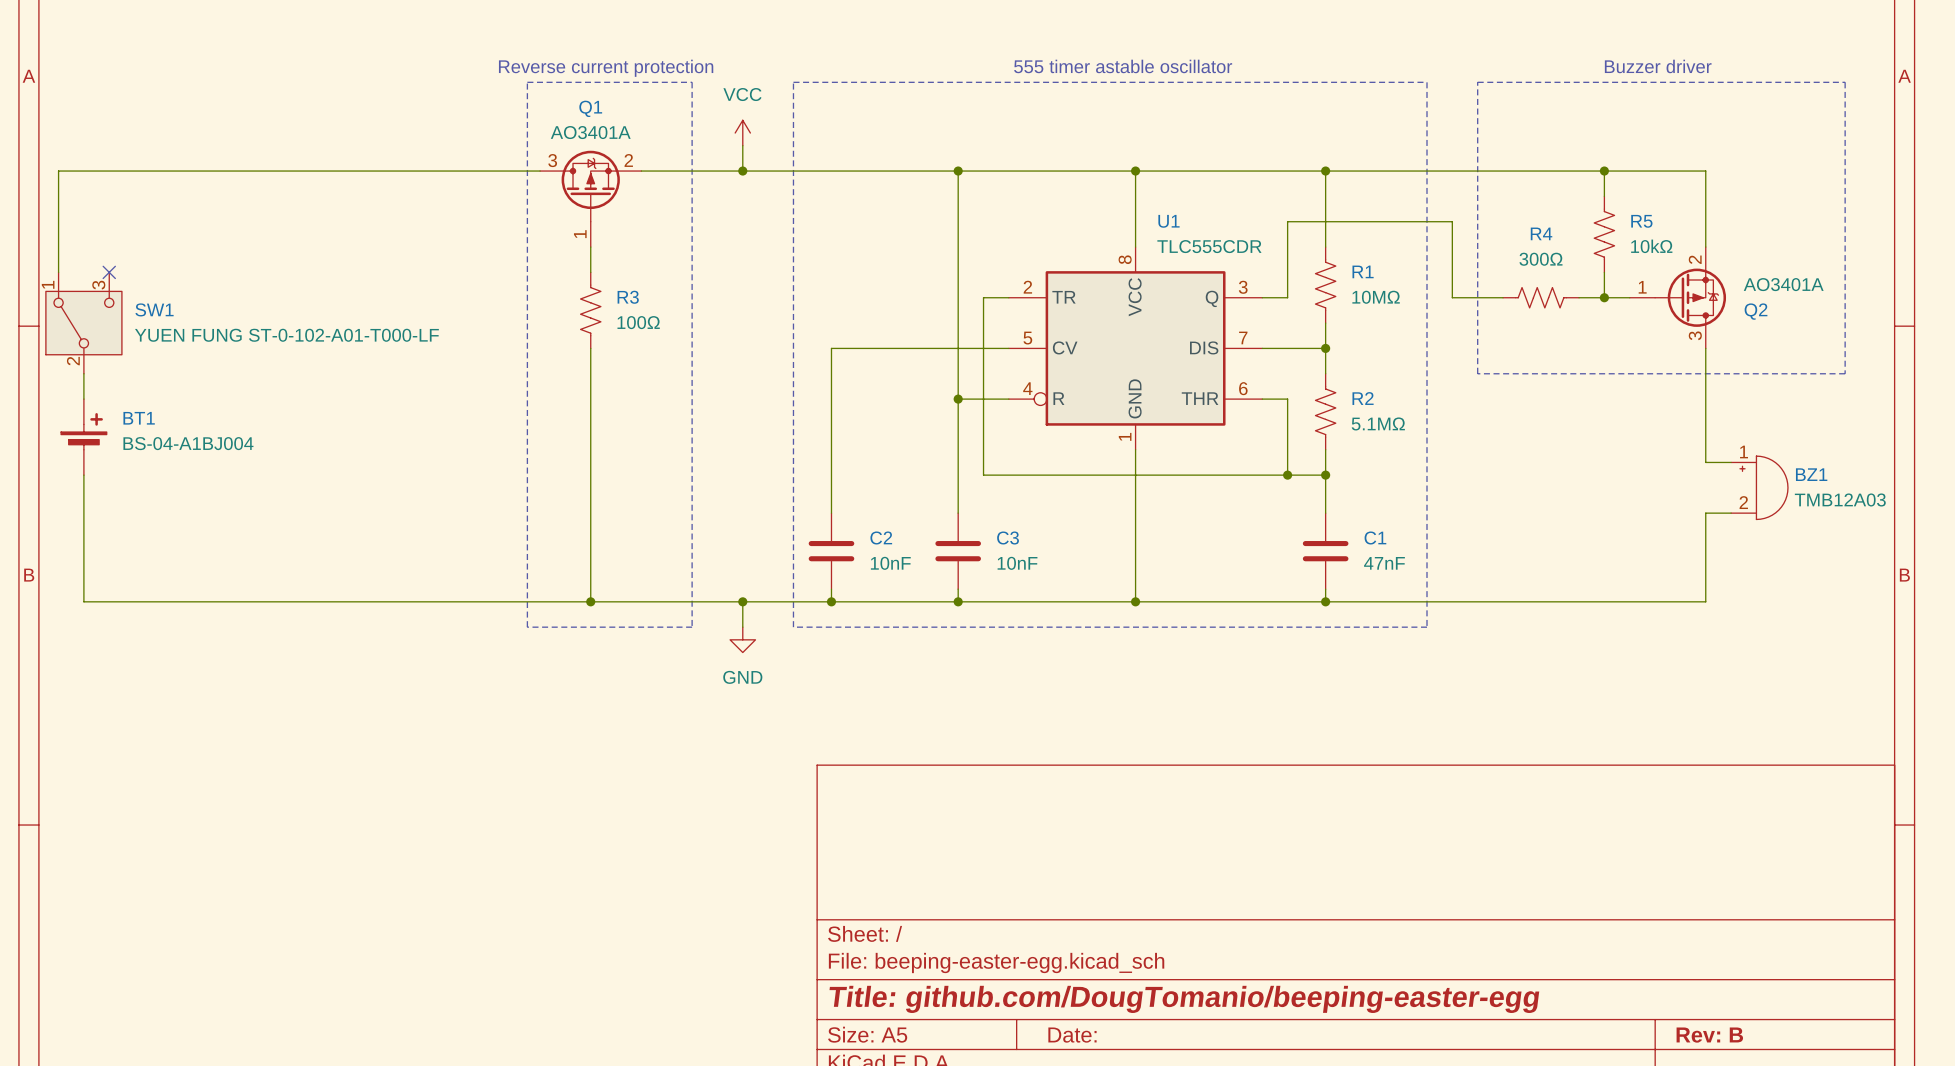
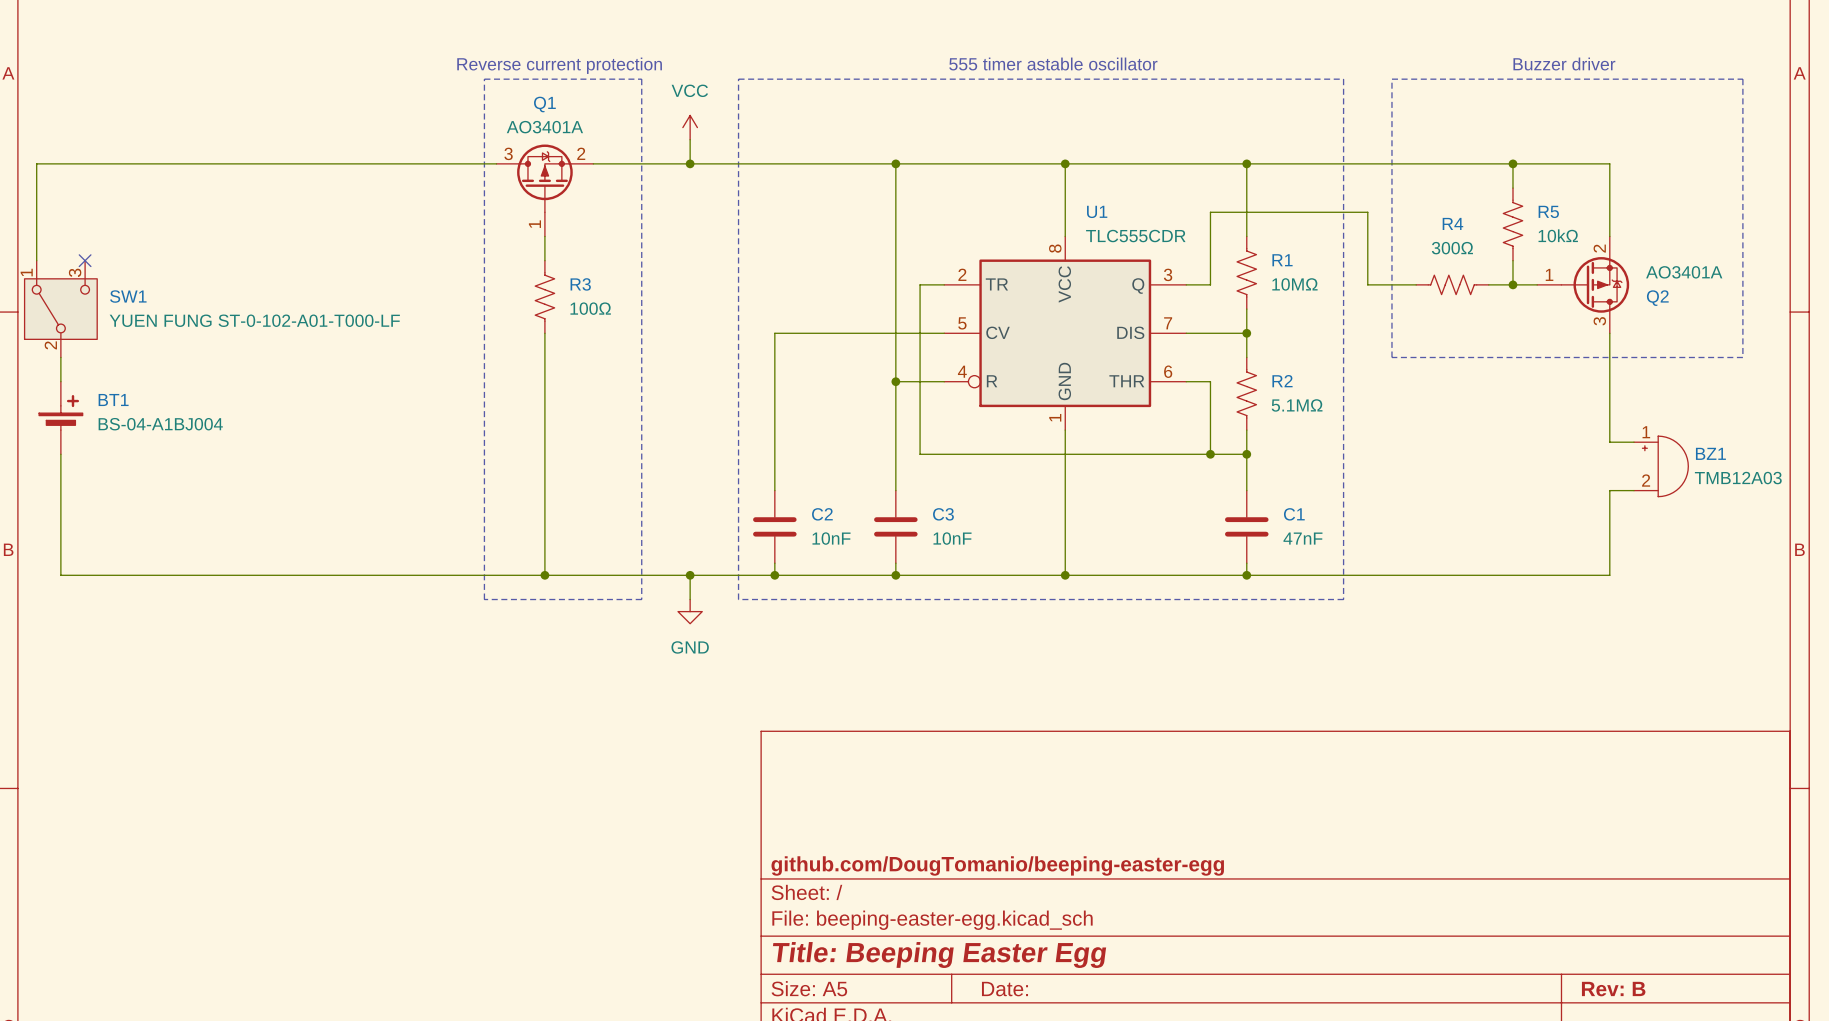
title block: none -> github.com/DougTomanio/beeping-easter-egg (997, 865)
title block: Title: github.com/DougTomanio/beeping-easter-egg (1184, 999) -> Title: Beeping Easter Egg (939, 955)

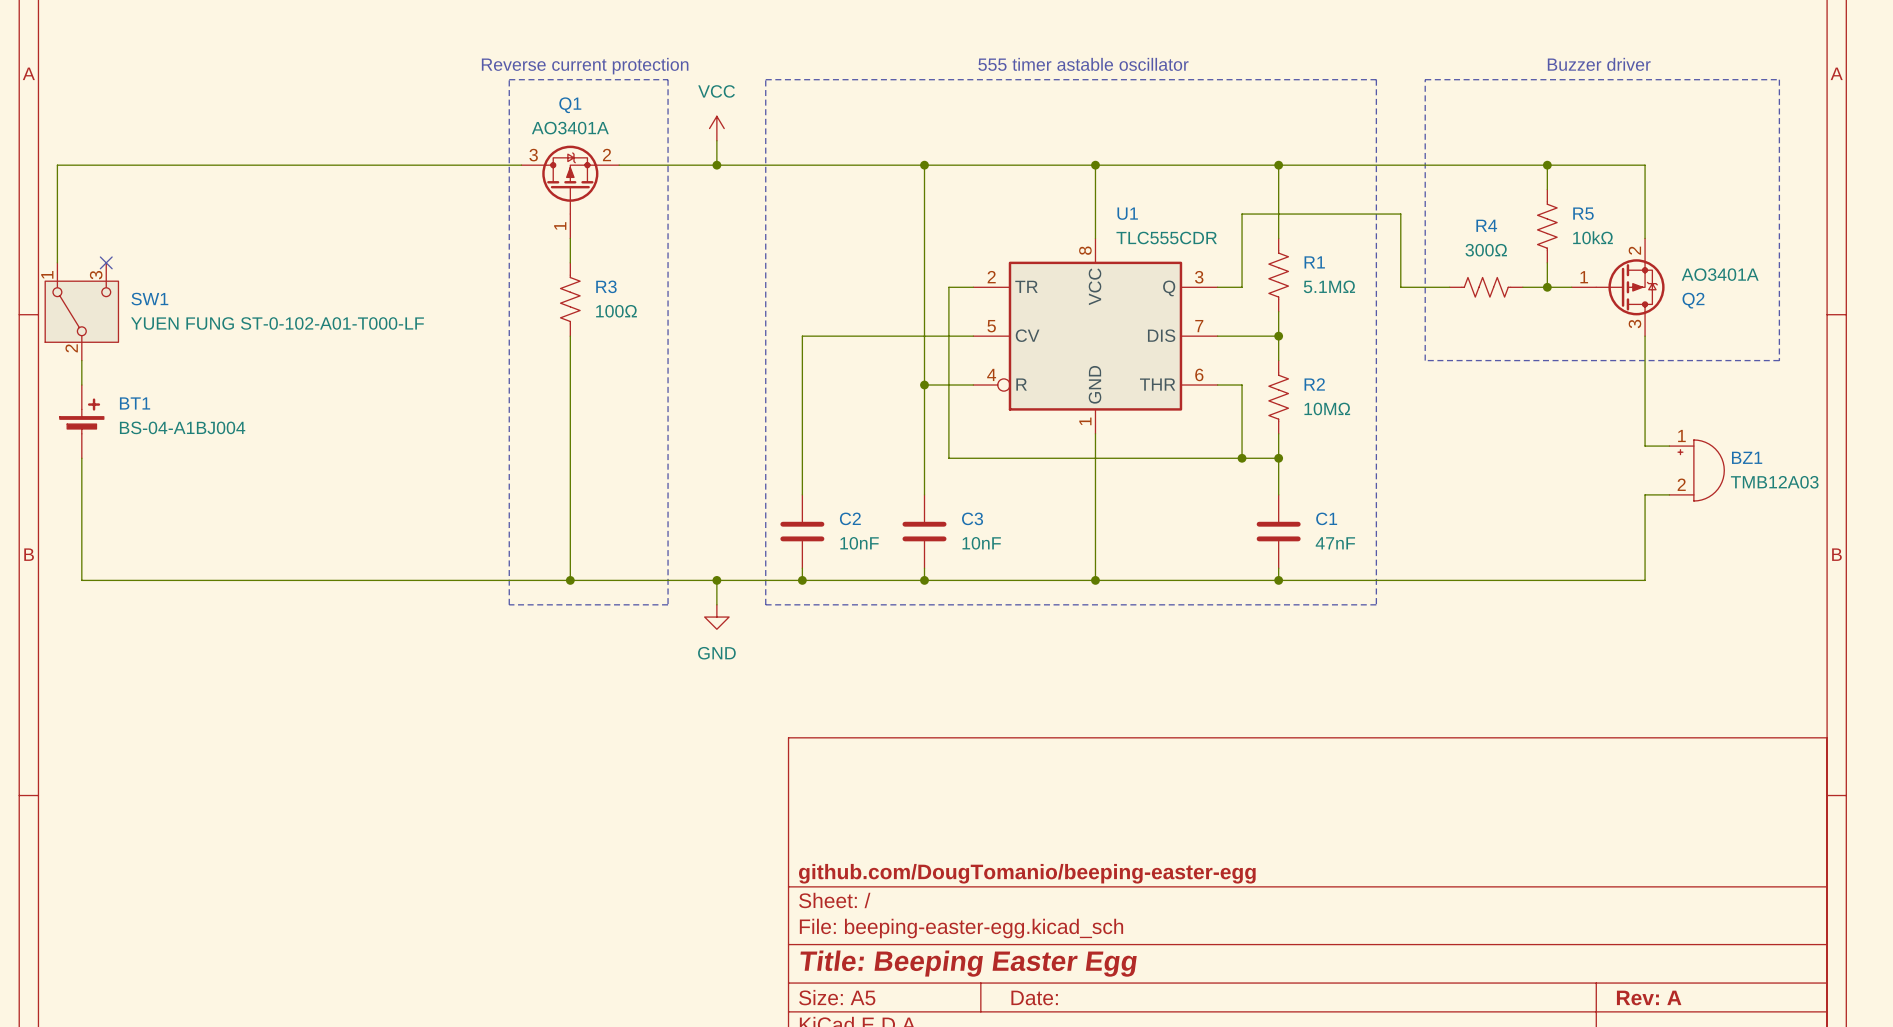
R1 value: 10MΩ (1294, 284) -> 5.1MΩ (1329, 286)
R2 value: 5.1MΩ (1297, 405) -> 10MΩ (1327, 408)
title block: Rev: B (1613, 989) -> Rev: A (1649, 997)

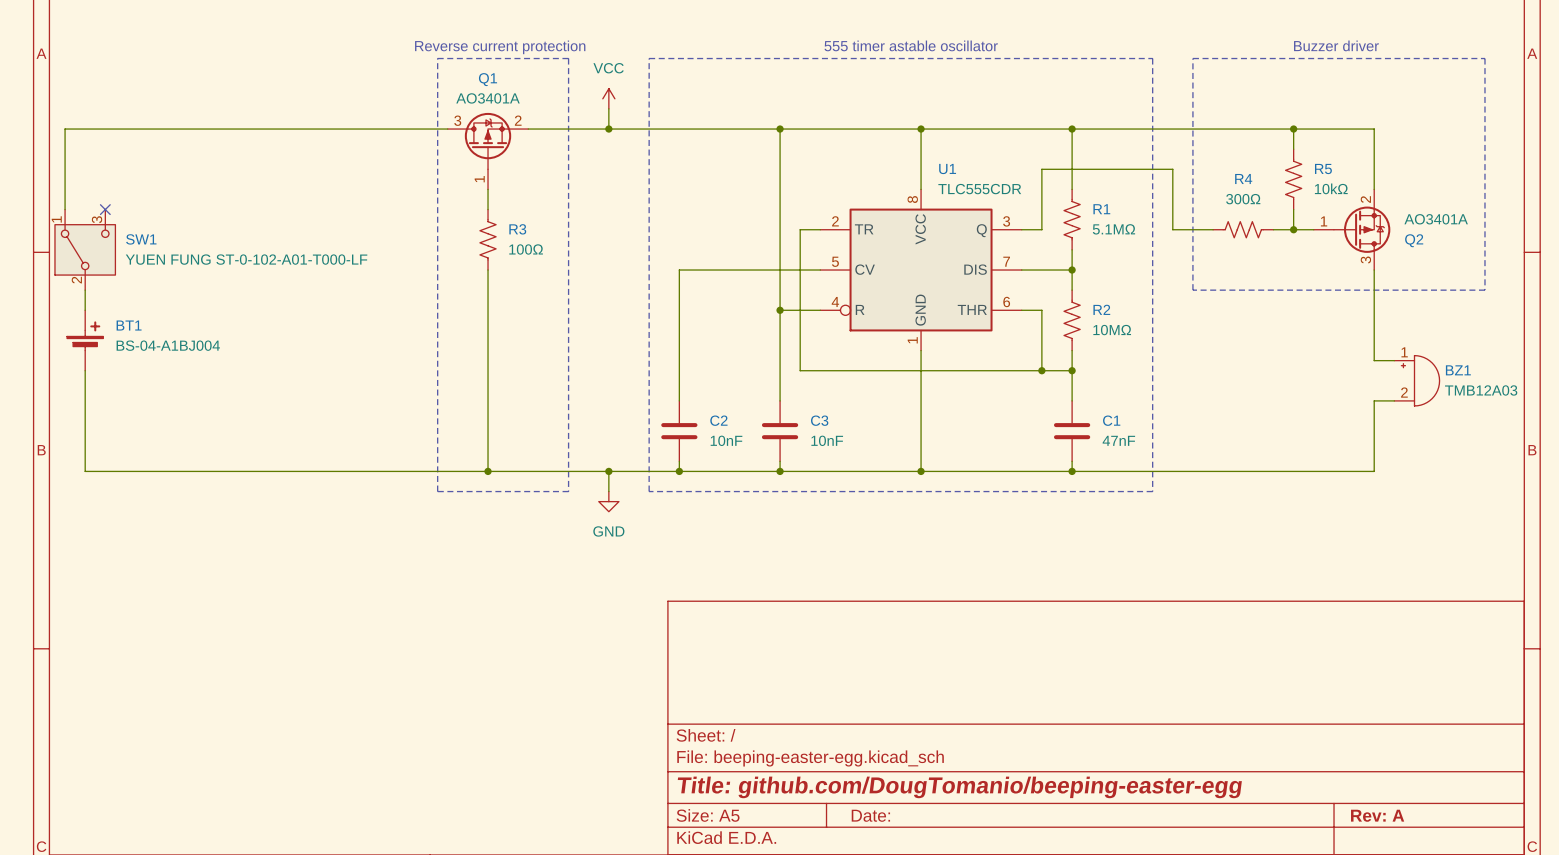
title block: github.com/DougTomanio/beeping-easter-egg (1027, 873) -> none
title block: Title: Beeping Easter Egg (968, 963) -> Title: github.com/DougTomanio/beeping-easter-egg (959, 787)

